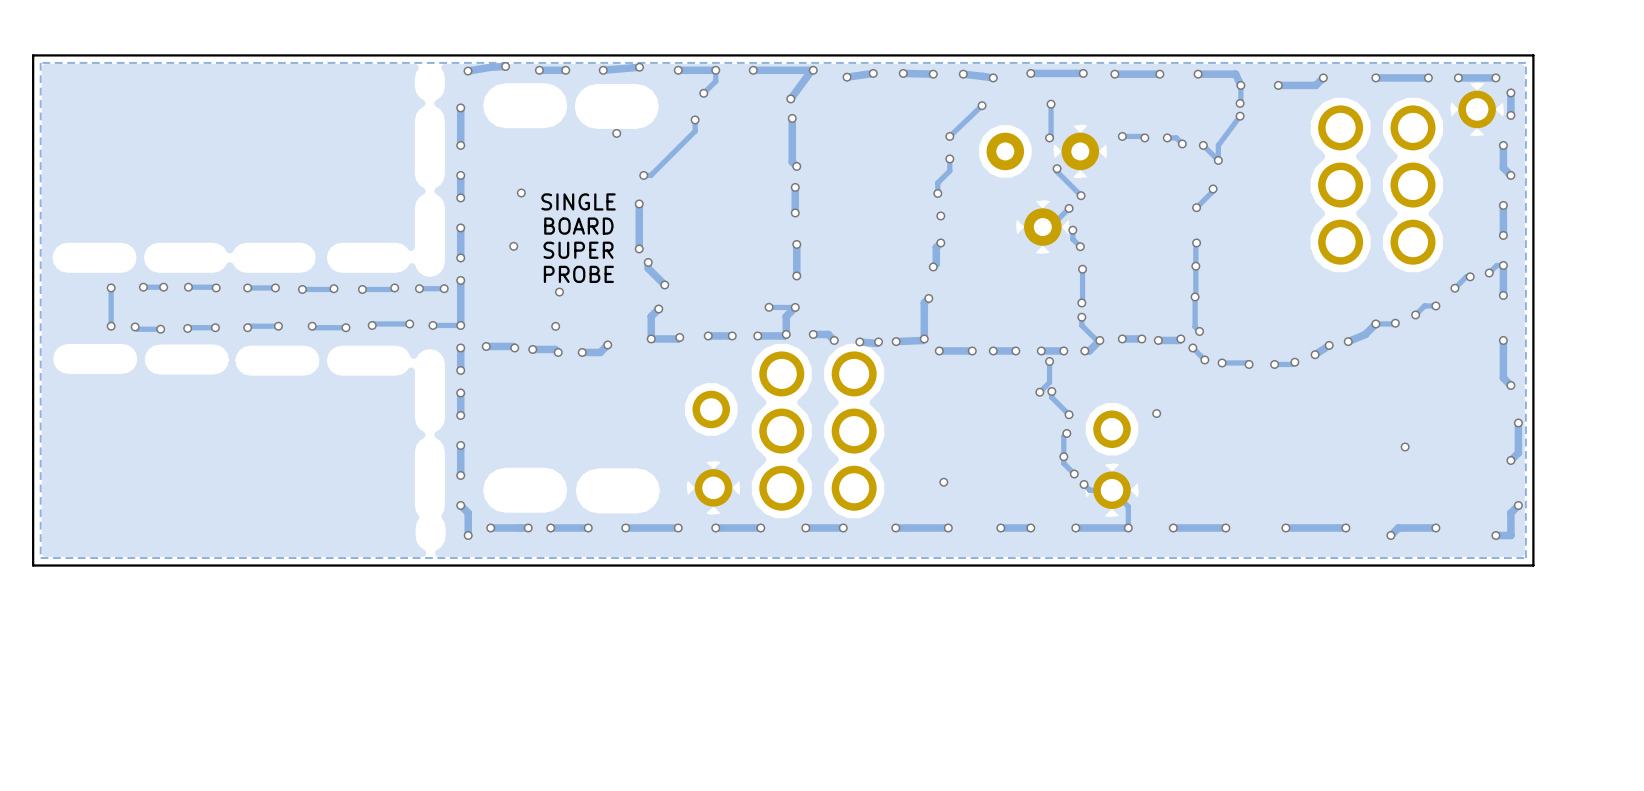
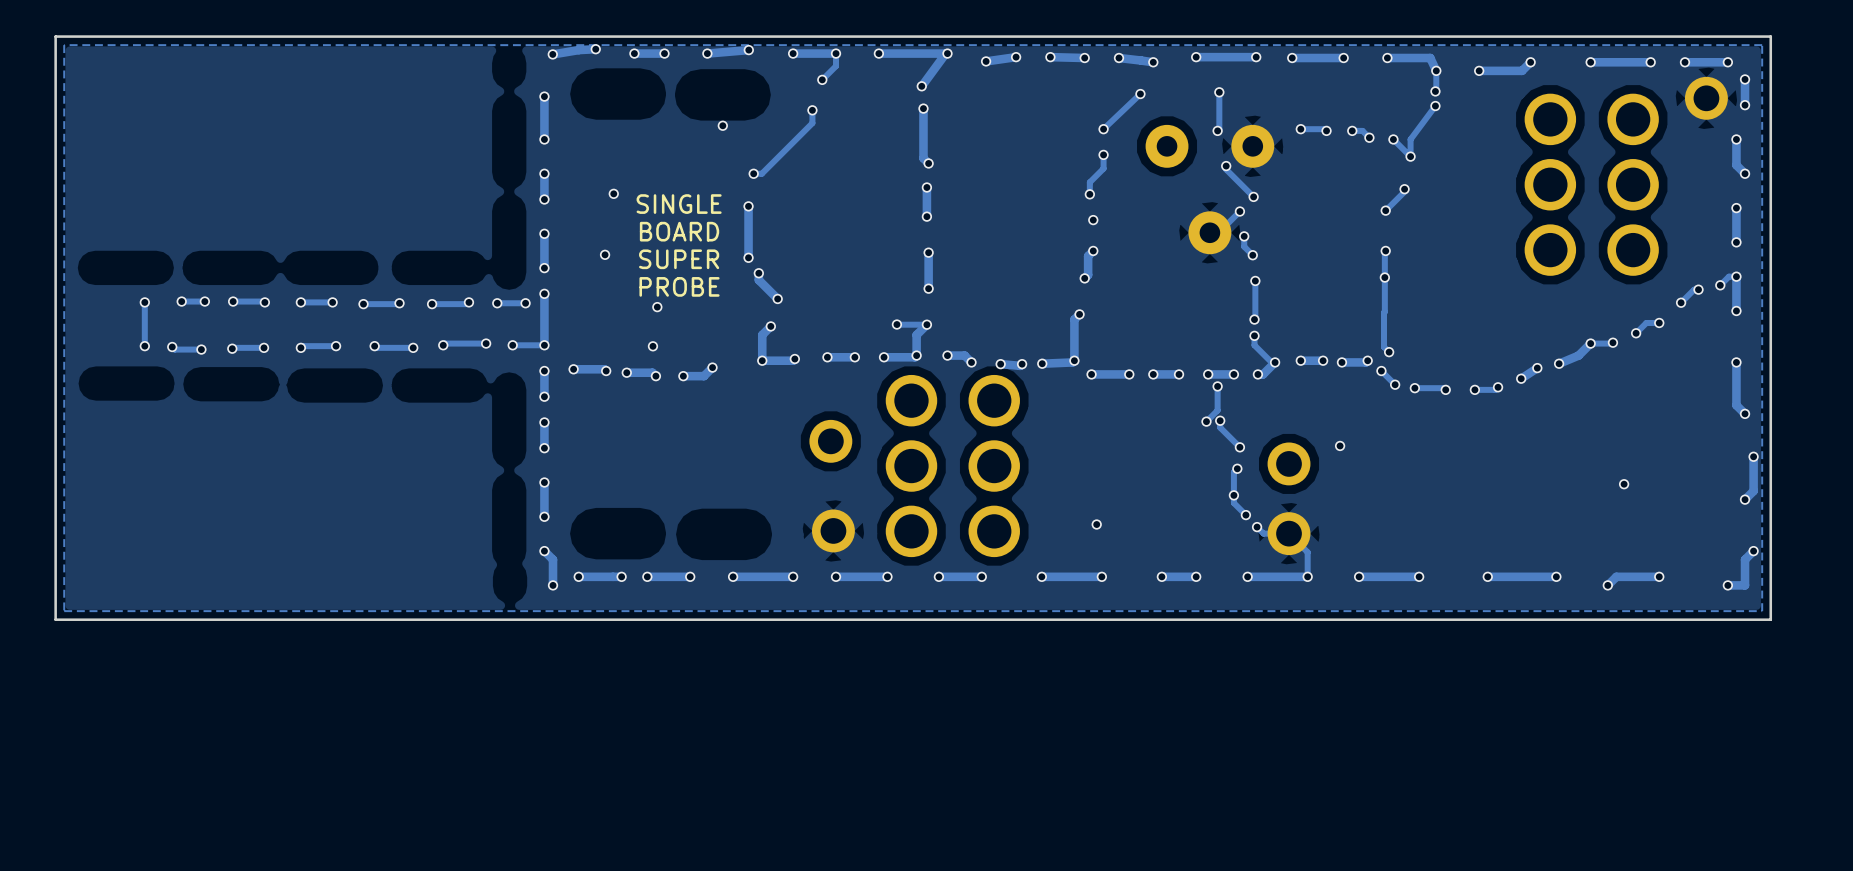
via: (1195, 296) -> none

